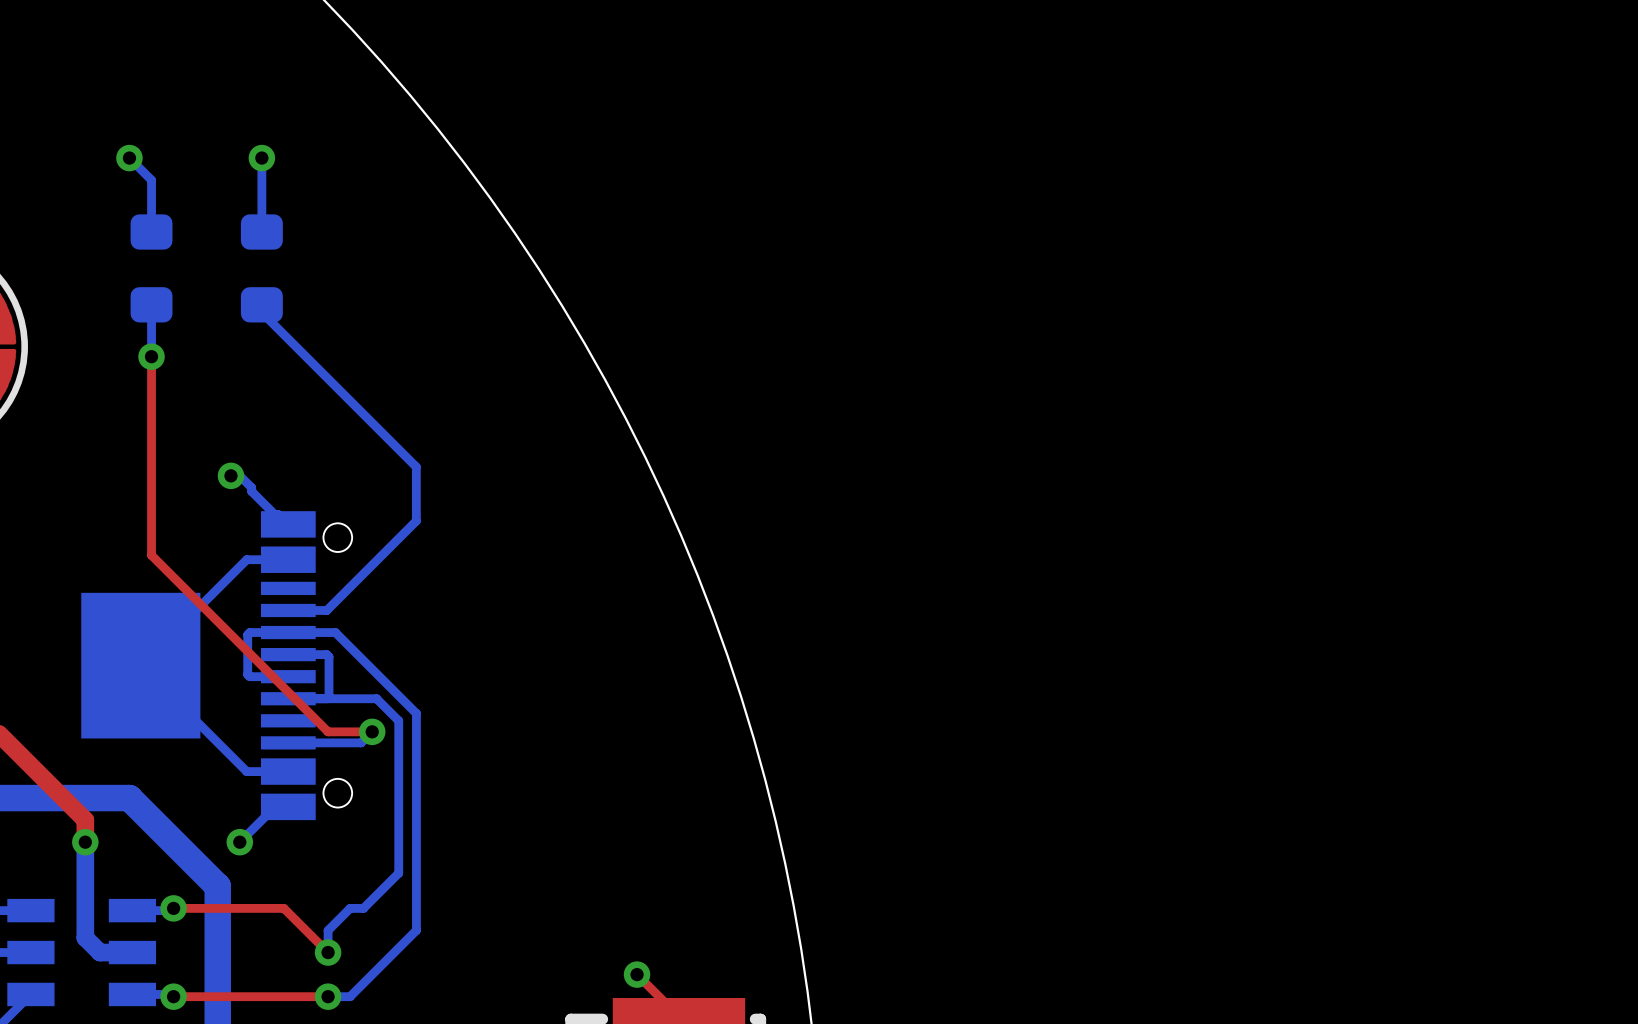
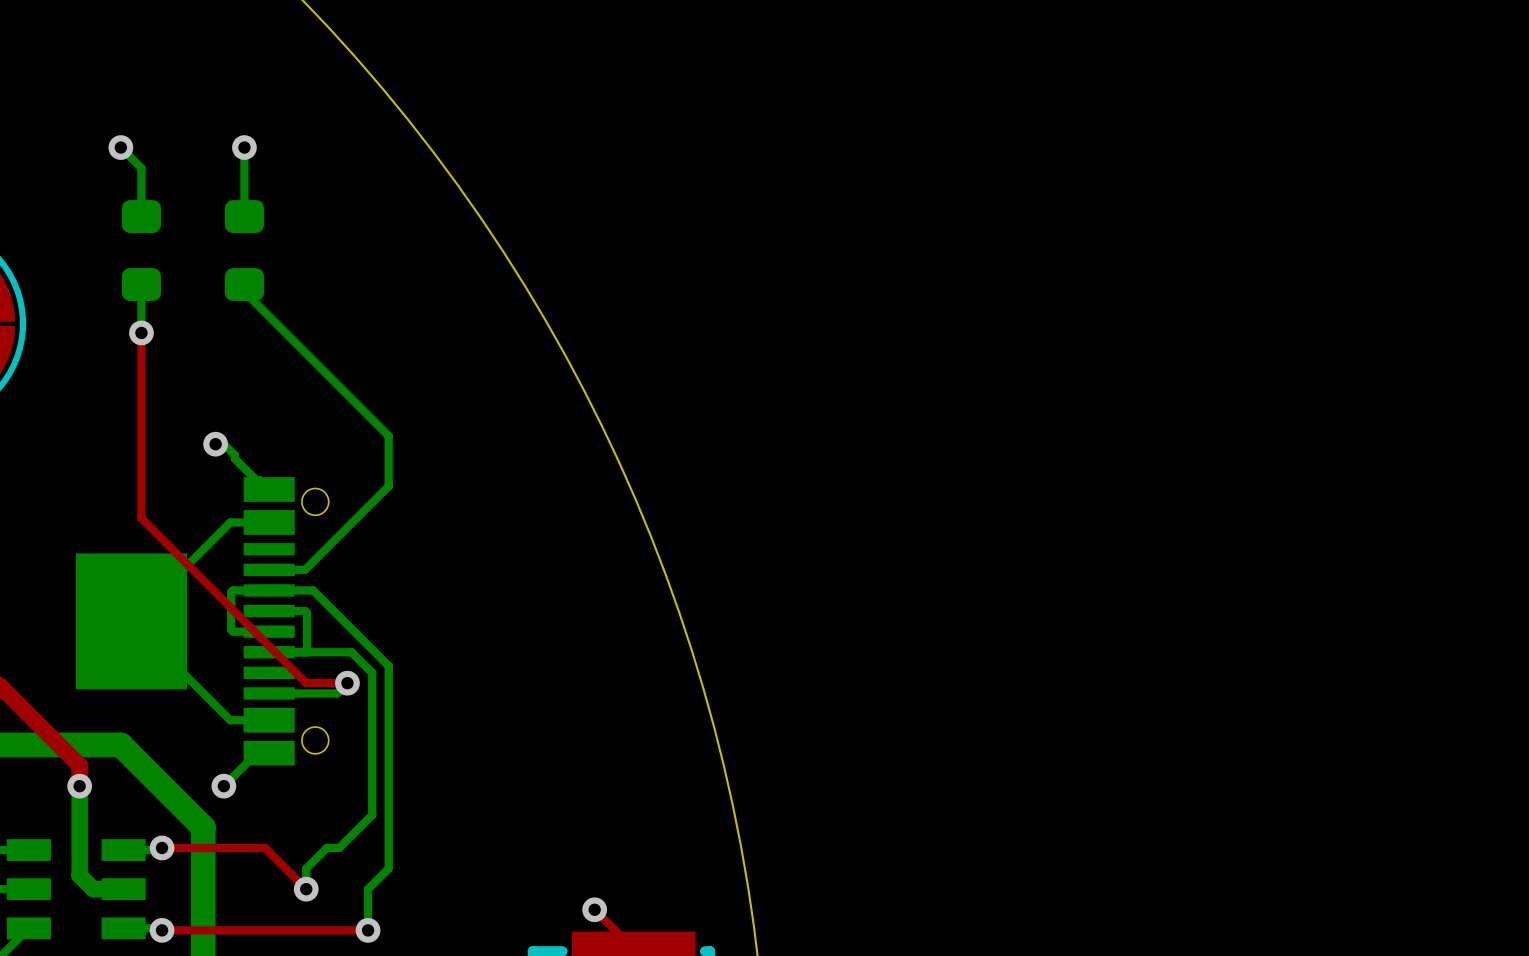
bottom track: (394, 952) (350, 996) (328, 996) -> (368, 889) (368, 930)
top track: none -> (306, 930) (368, 930)
via position: (328, 996) -> (368, 930)

